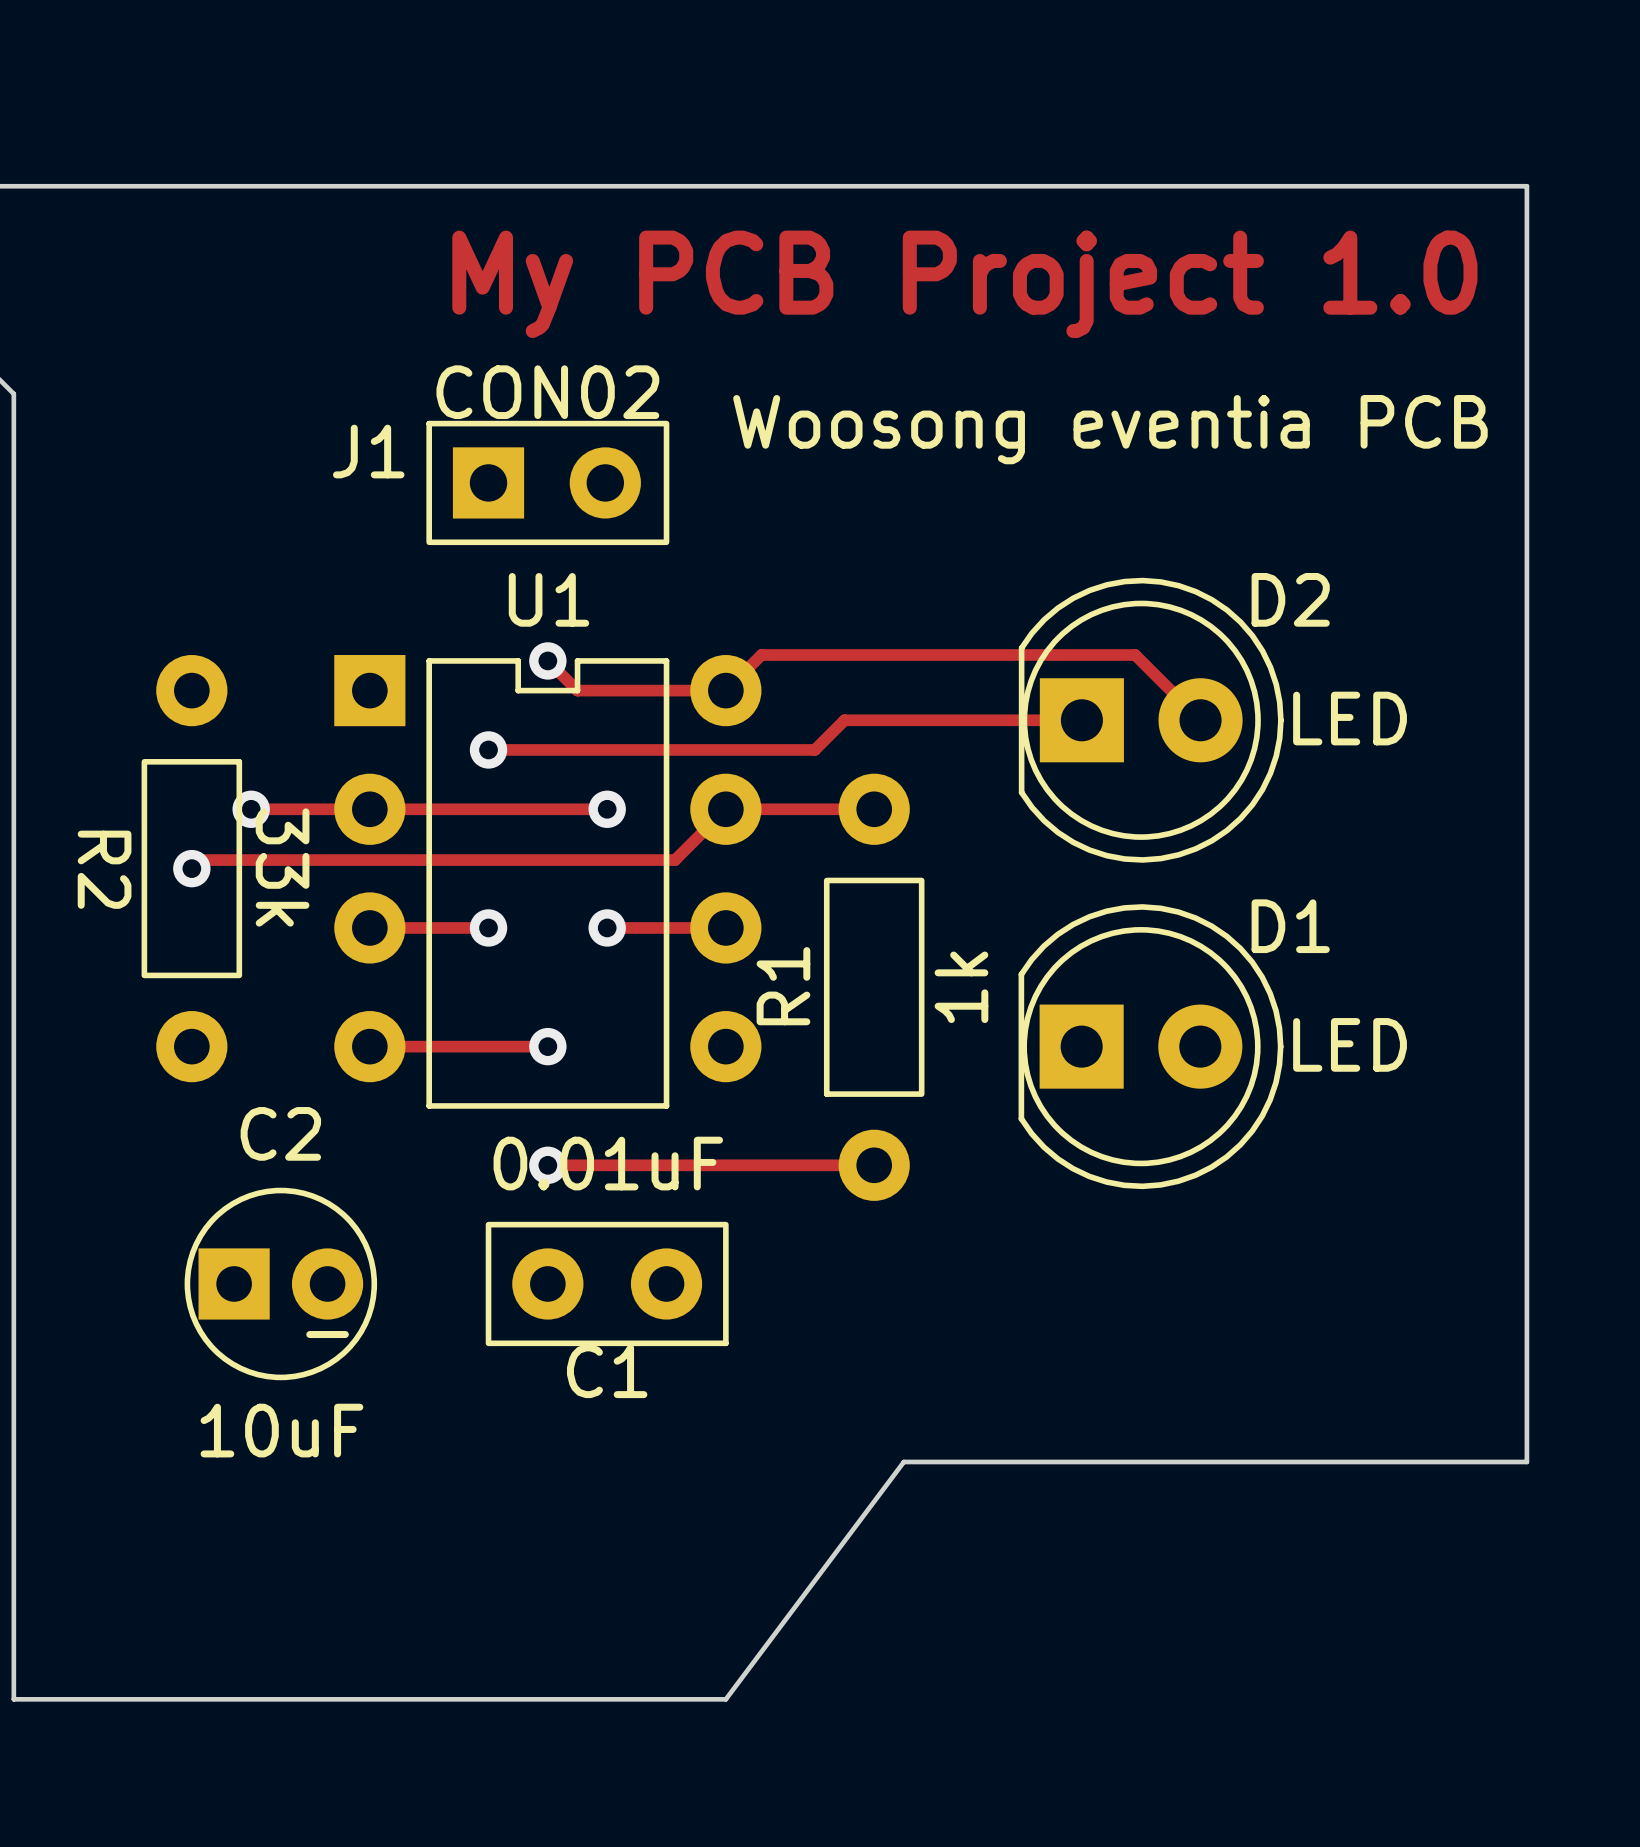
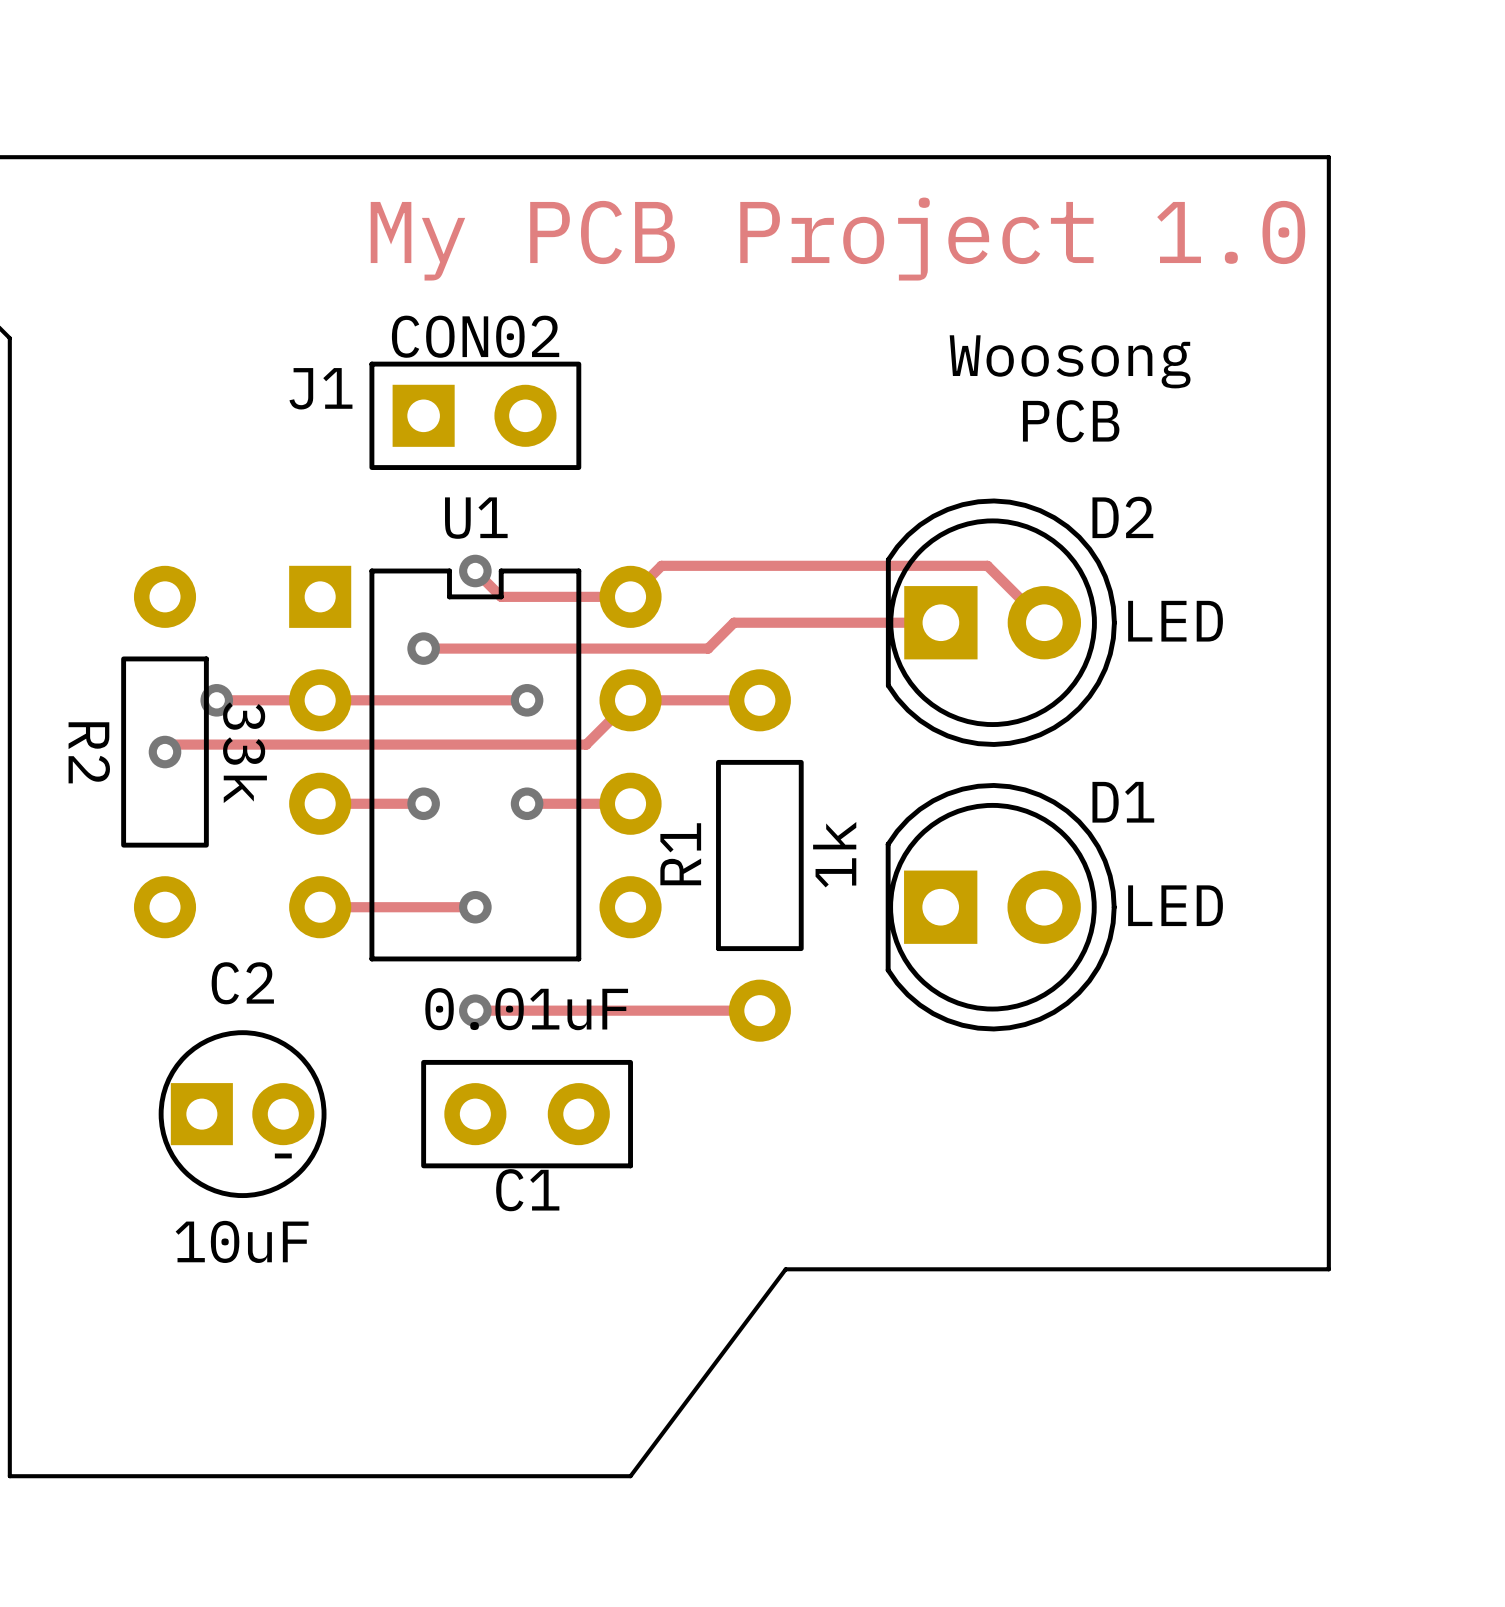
text: none -> Woosong (1070, 361)
text: Woosong eventia PCB (1110, 429) -> none
text: none -> PCB (1071, 421)

